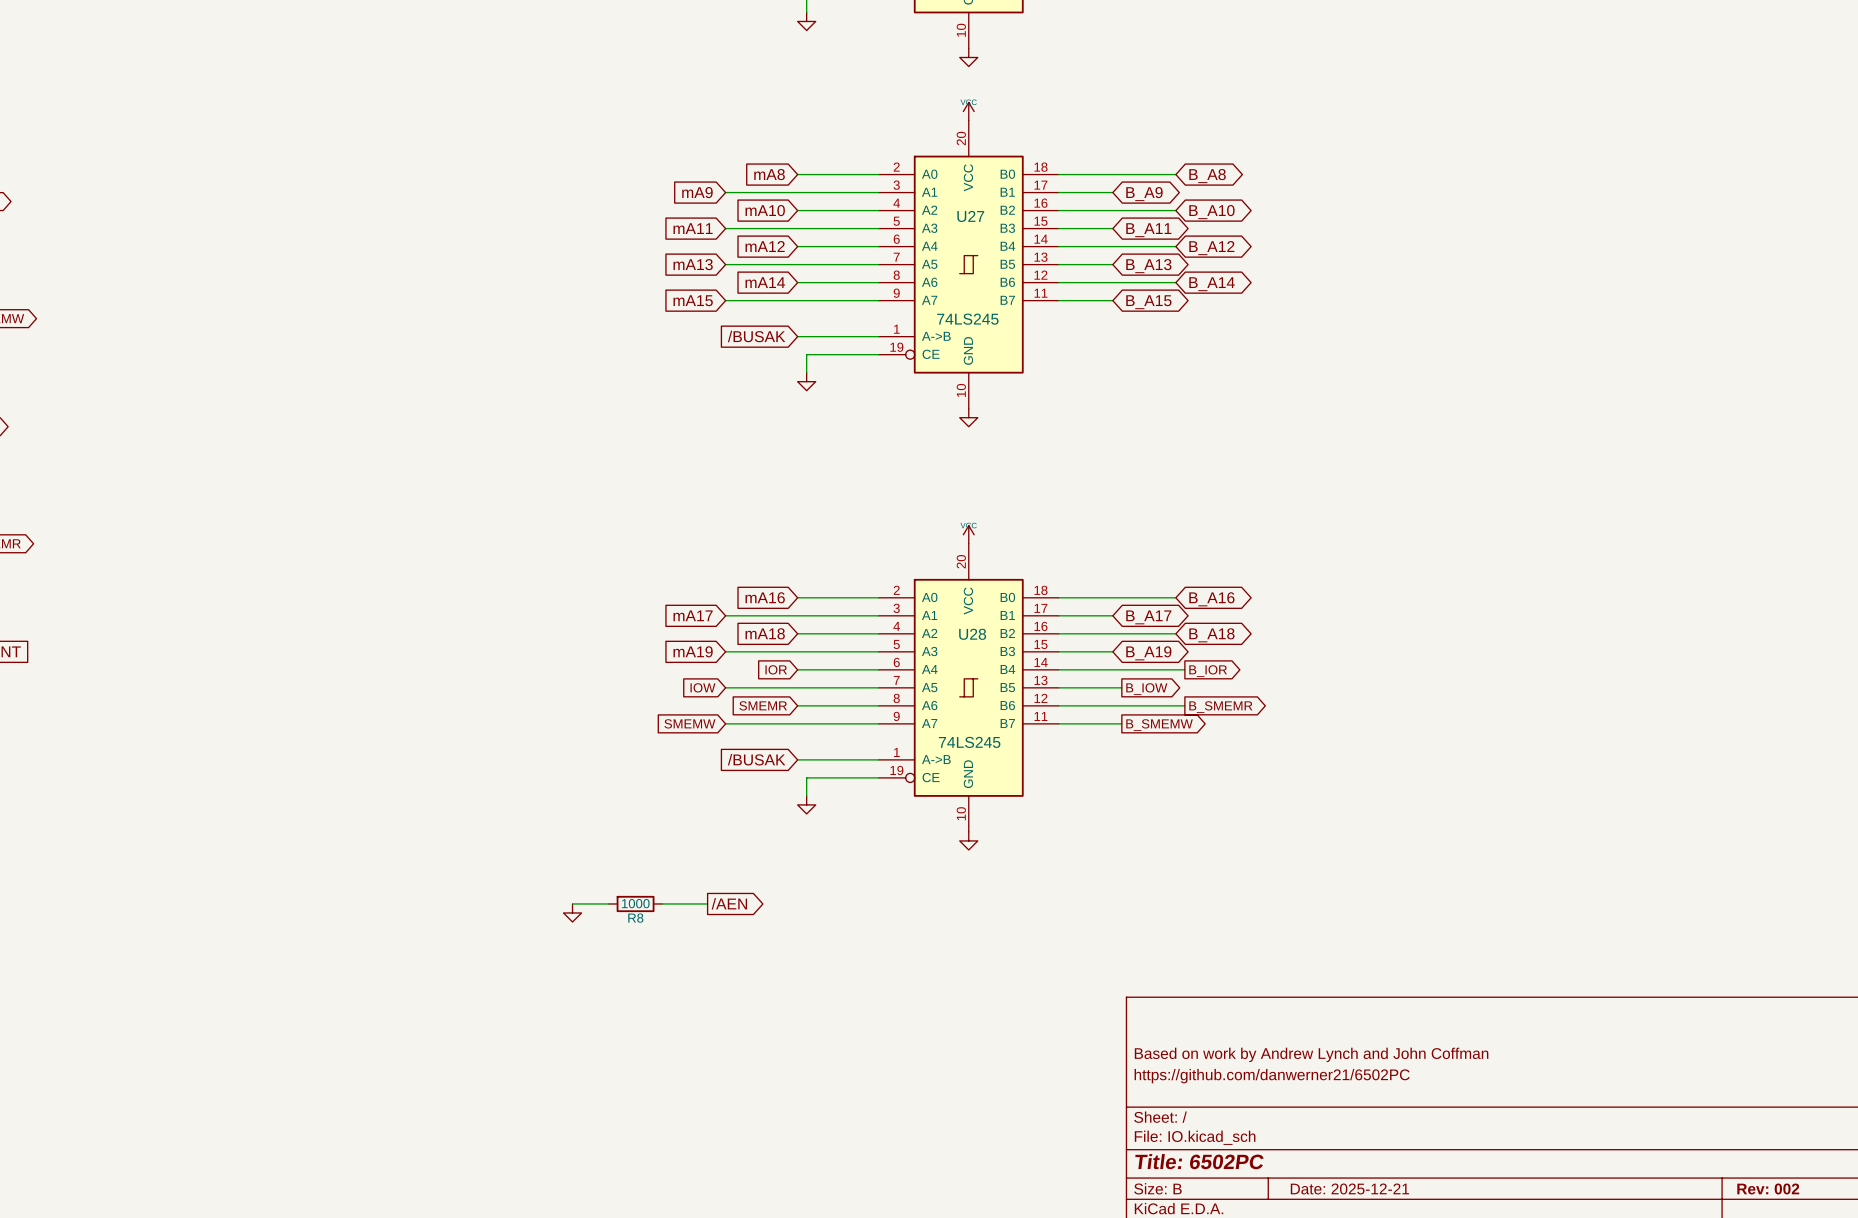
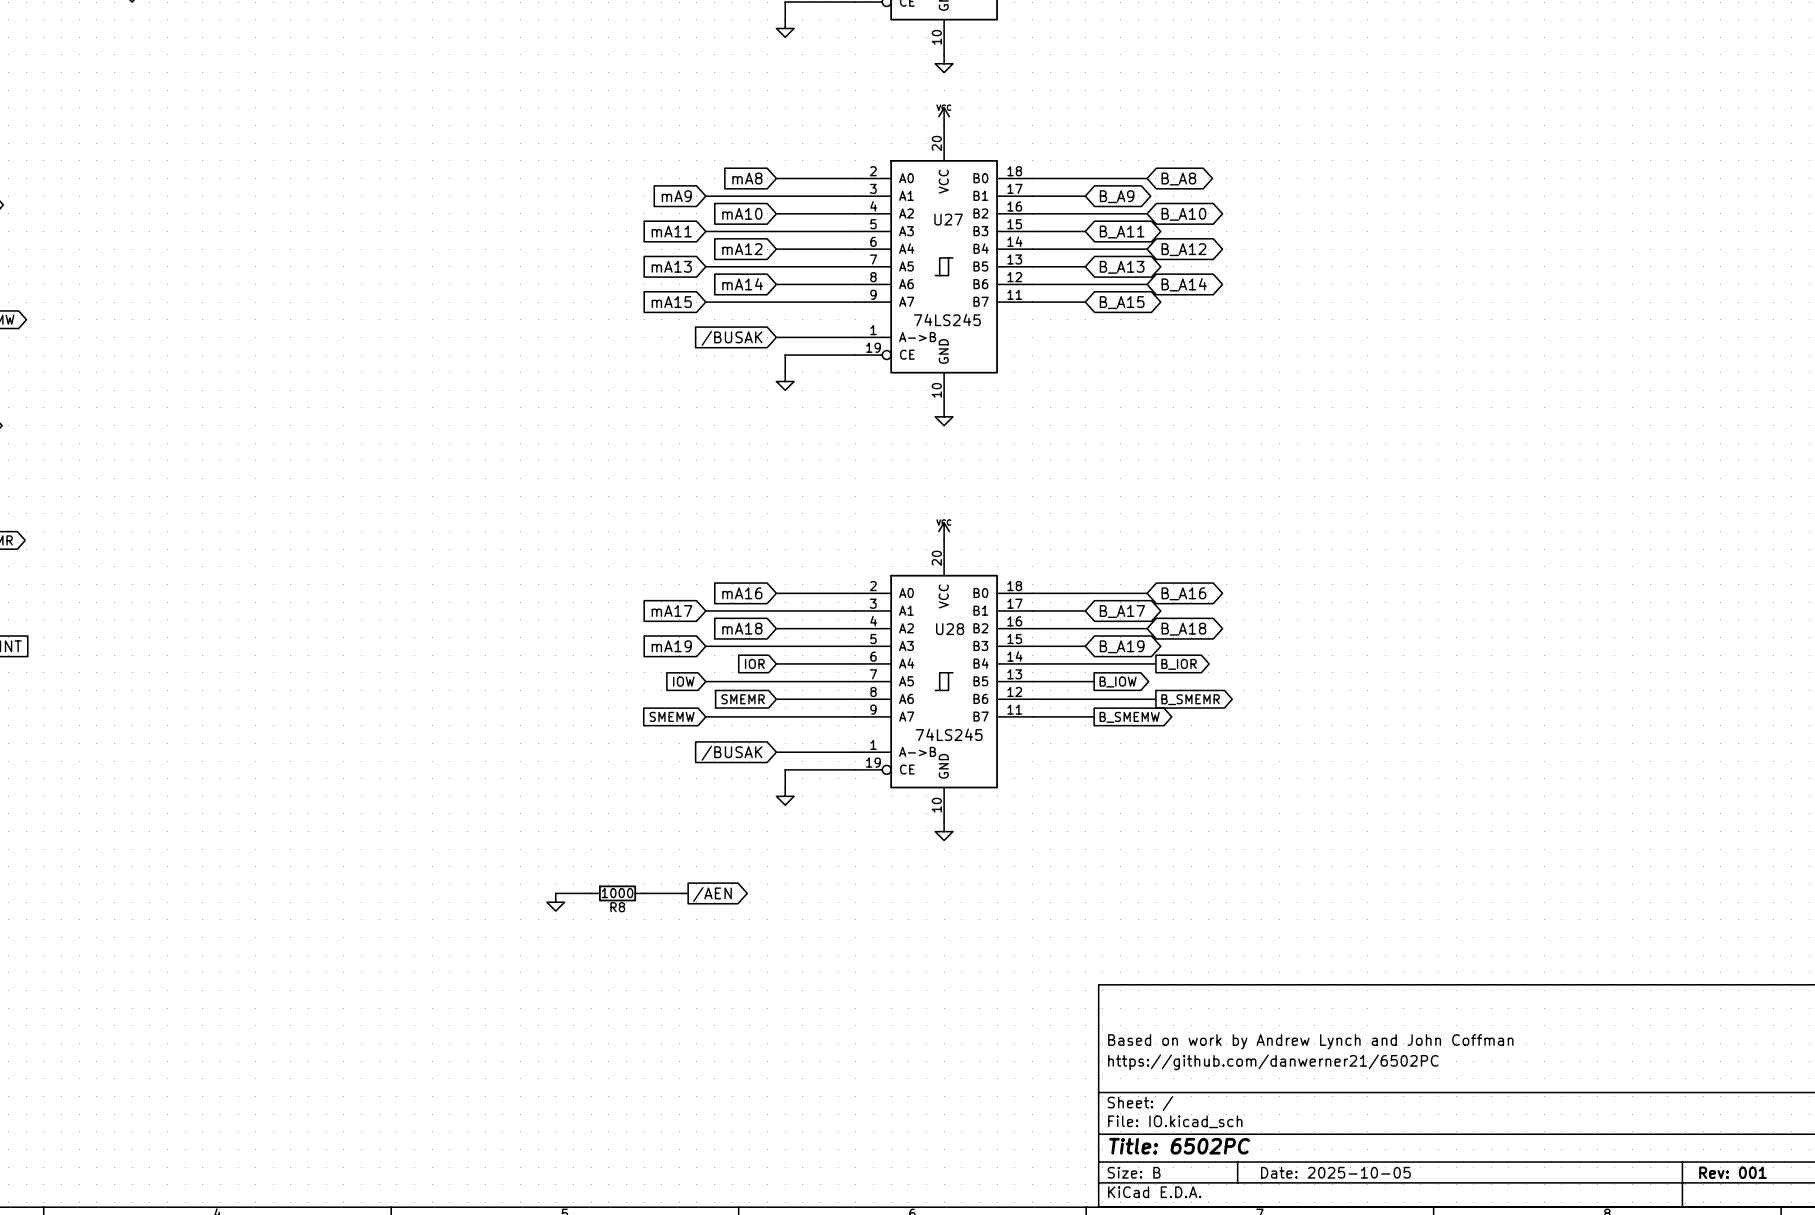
title block: Date: 2025-12-21 (1349, 1188) -> Date: 2025-10-05 (1335, 1172)
title block: Rev: 002 (1768, 1188) -> Rev: 001 (1732, 1172)

